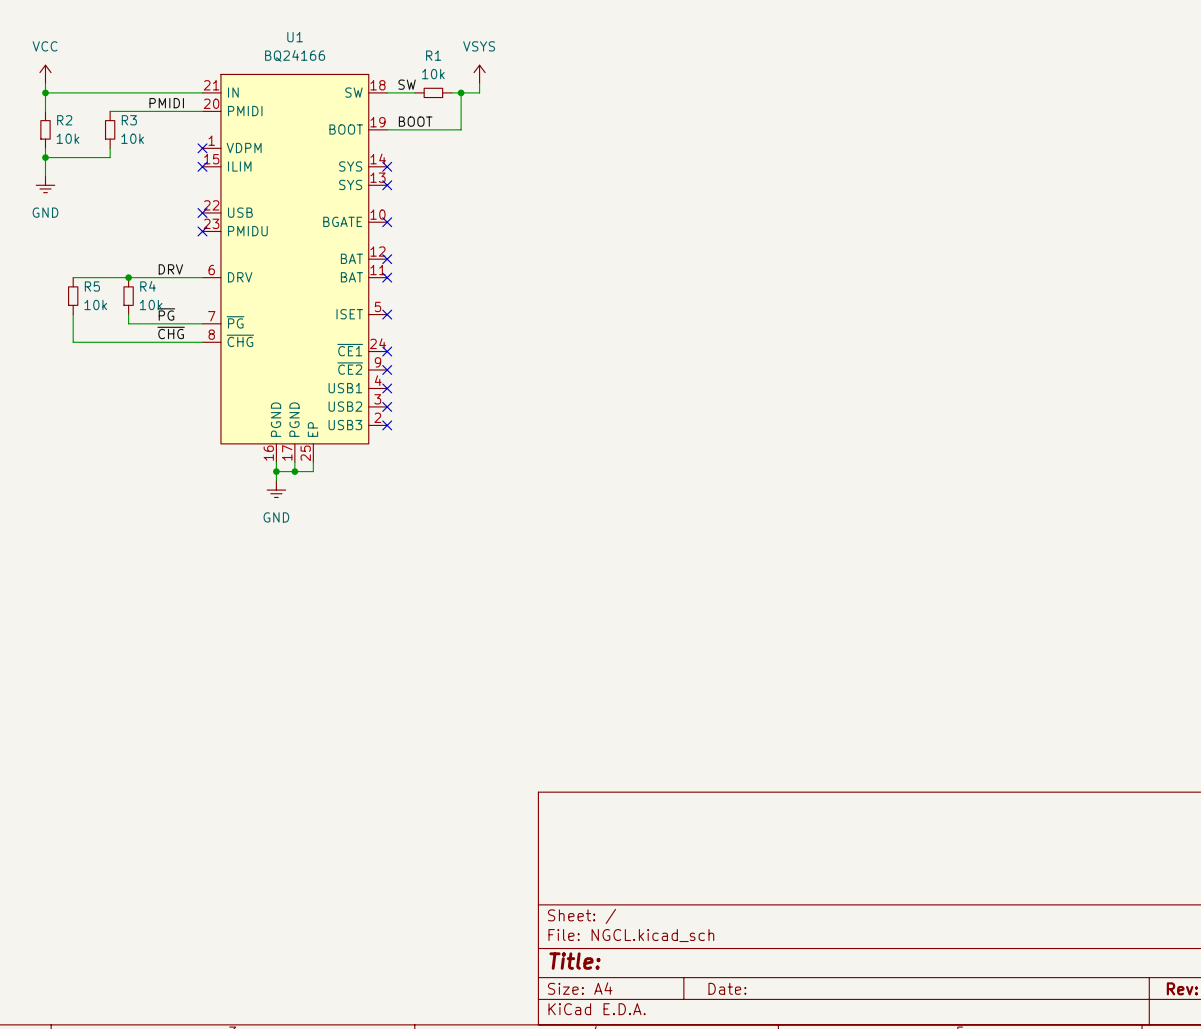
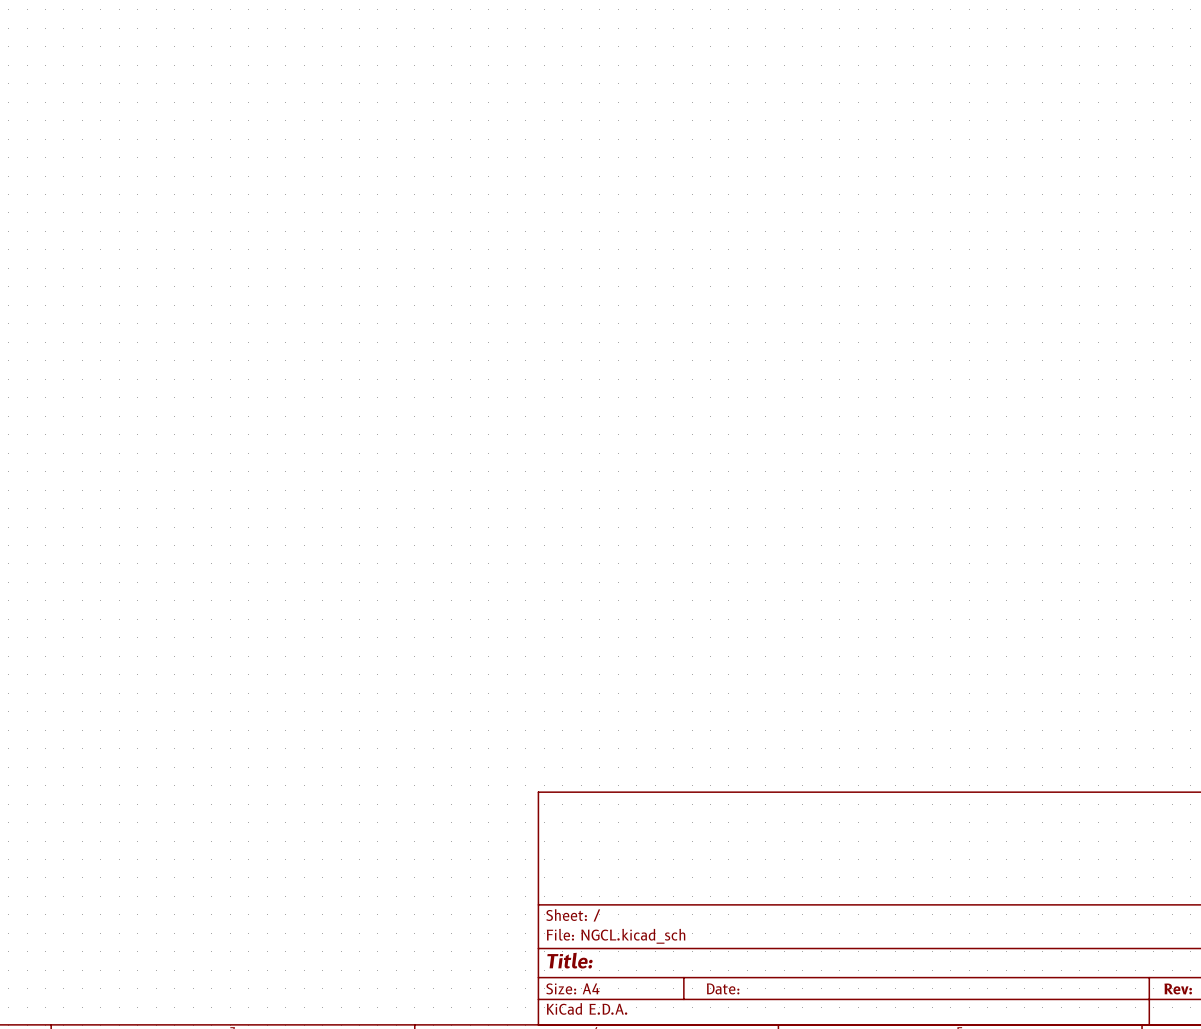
power symbol: VCC (45, 74) -> none
power symbol: VSYS (479, 74) -> none
wire: (45, 83) (45, 111) -> none
wire: (479, 83) (479, 92) (451, 92) -> none
label: SW (407, 84) -> none
wire: (45, 92) (202, 92) -> none
junction: (45, 92) -> none
wire: (387, 92) (414, 92) -> none
R1: 10k (433, 92) -> none
wire: (461, 92) (461, 129) (387, 129) -> none
junction: (461, 92) -> none
label: PMIDI (166, 103) -> none
wire: (110, 111) (202, 111) -> none
label: BOOT (415, 121) -> none
R2: 10k (45, 129) -> none
R3: 10k (110, 129) -> none
wire: (45, 148) (45, 176) -> none
wire: (110, 148) (110, 157) (45, 157) -> none
no-connect mark: (202, 148) -> none
junction: (45, 157) -> none
no-connect mark: (202, 166) -> none
no-connect mark: (387, 166) -> none
power symbol: GND (45, 184) -> none
no-connect mark: (387, 185) -> none
no-connect mark: (202, 212) -> none
no-connect mark: (387, 222) -> none
no-connect mark: (202, 231) -> none
no-connect mark: (387, 259) -> none
U1: BQ24166 (294, 268) -> none
label: DRV (170, 269) -> none
wire: (73, 277) (202, 277) -> none
junction: (128, 277) -> none
no-connect mark: (387, 277) -> none
R5: 10k (73, 296) -> none
R4: 10k (128, 296) -> none
wire: (73, 314) (73, 342) (202, 342) -> none
wire: (128, 314) (128, 323) (202, 323) -> none
label: ~{PG} (166, 314) -> none
no-connect mark: (387, 314) -> none
label: ~{CHG} (171, 332) -> none
no-connect mark: (387, 351) -> none
no-connect mark: (387, 370) -> none
no-connect mark: (387, 388) -> none
no-connect mark: (387, 406) -> none
no-connect mark: (387, 425) -> none
wire: (276, 462) (276, 480) -> none
wire: (294, 462) (294, 471) -> none
wire: (313, 462) (313, 471) (276, 471) -> none
junction: (276, 471) -> none
junction: (294, 471) -> none
power symbol: GND (276, 489) -> none

